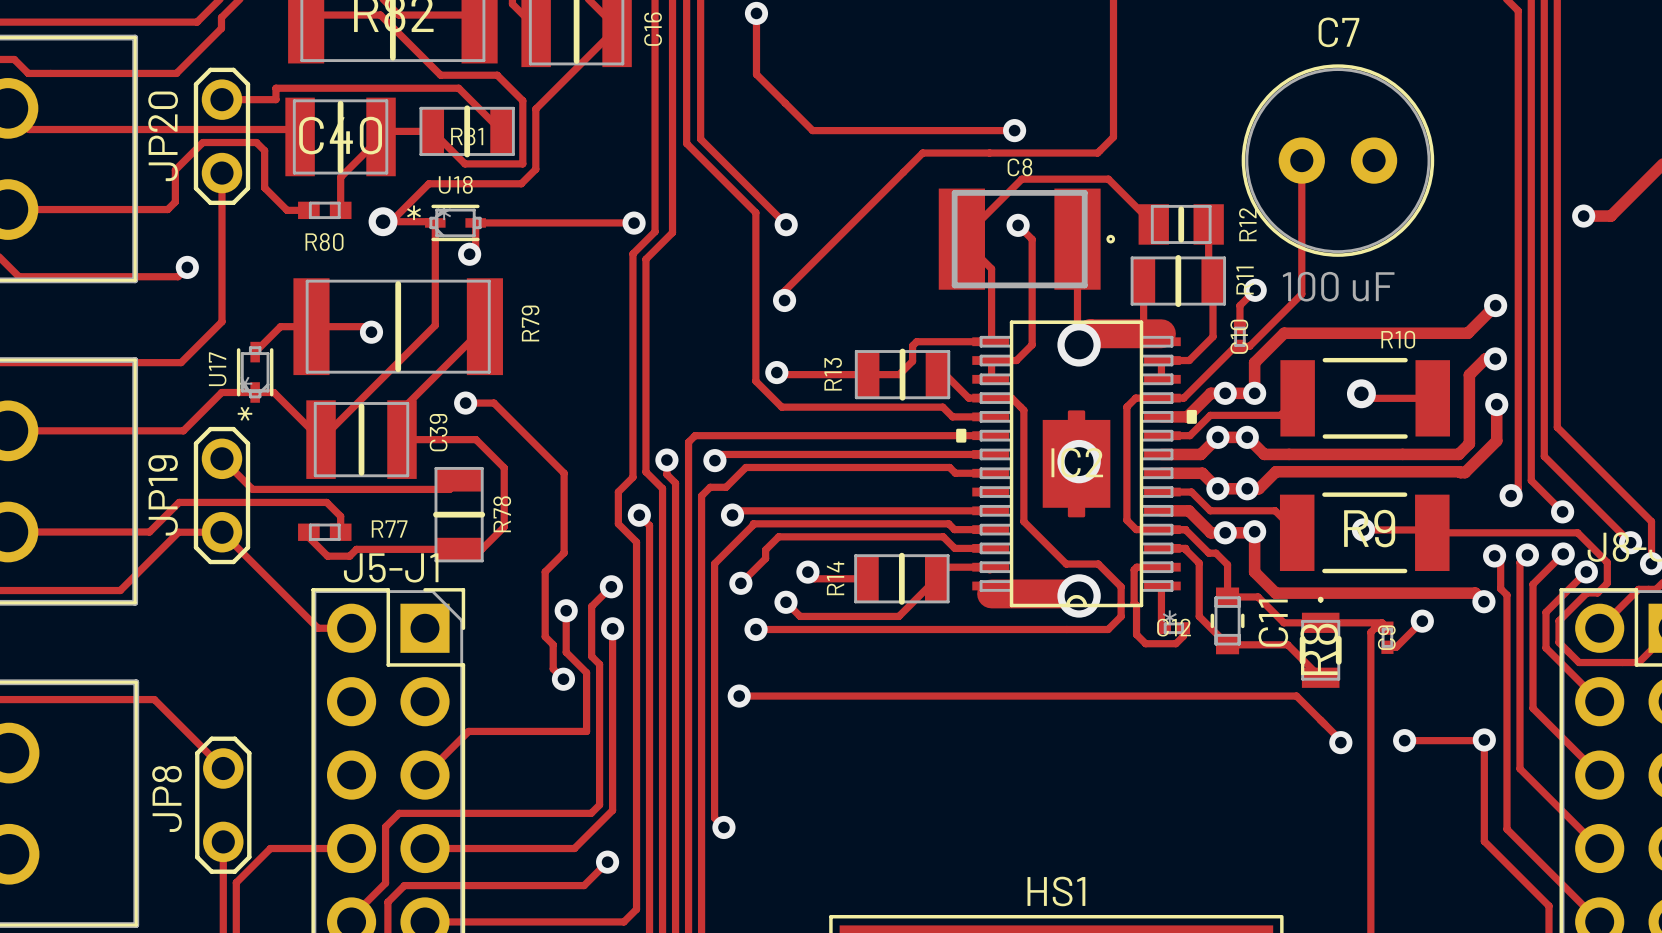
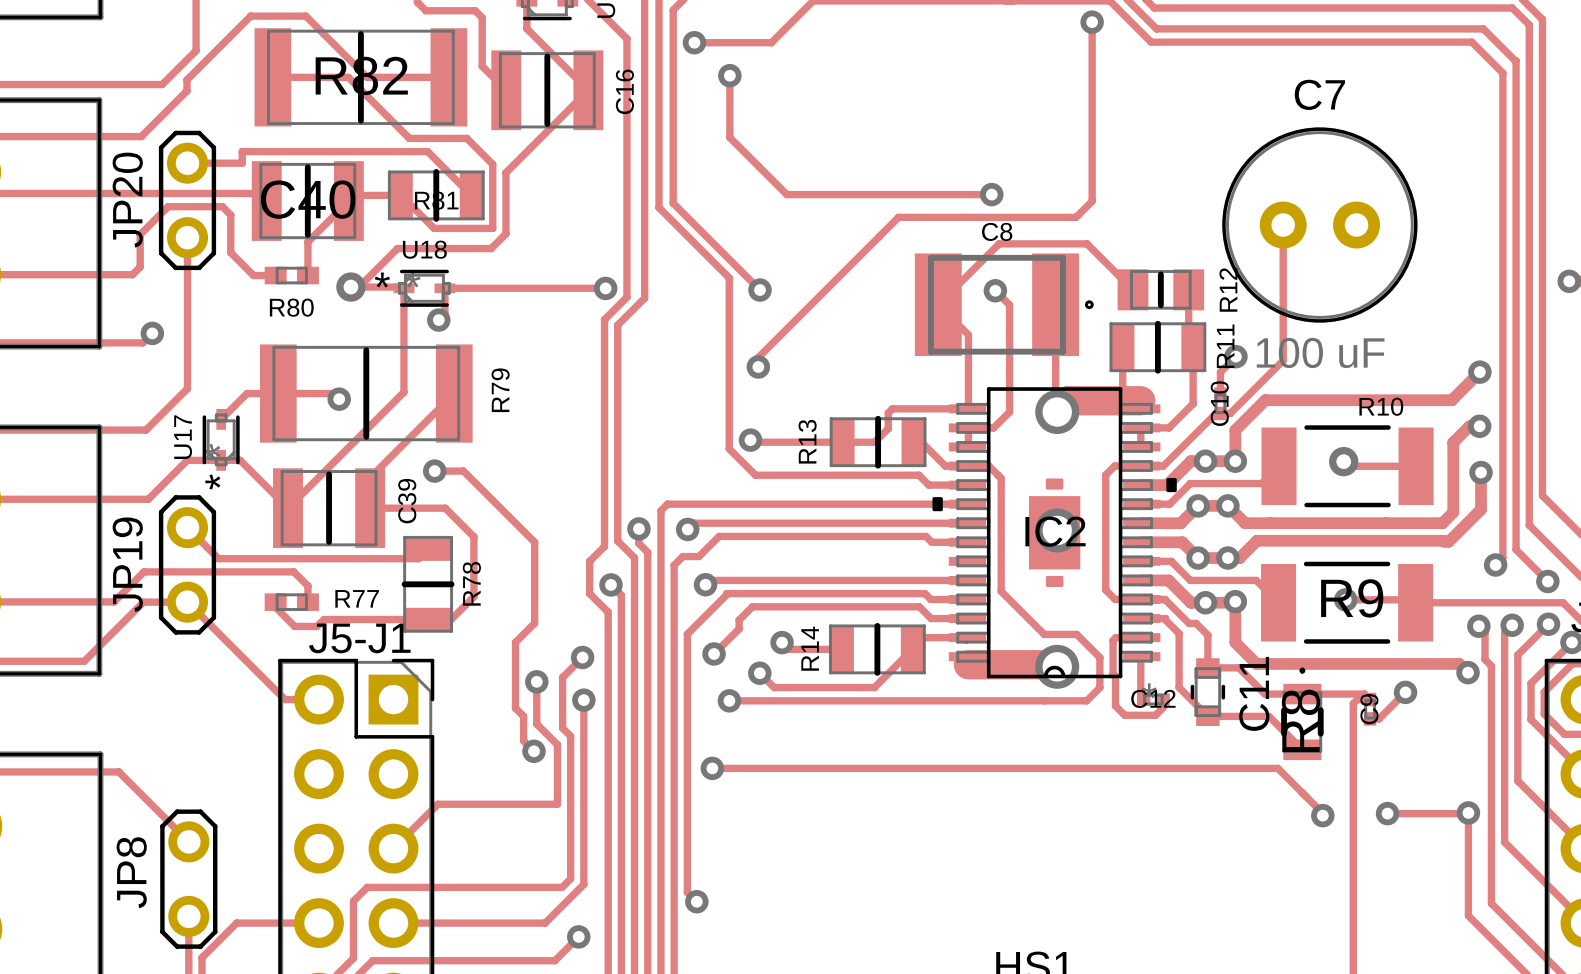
IC2 footprint: [956, 320, 1197, 608] -> [932, 387, 1177, 679]

